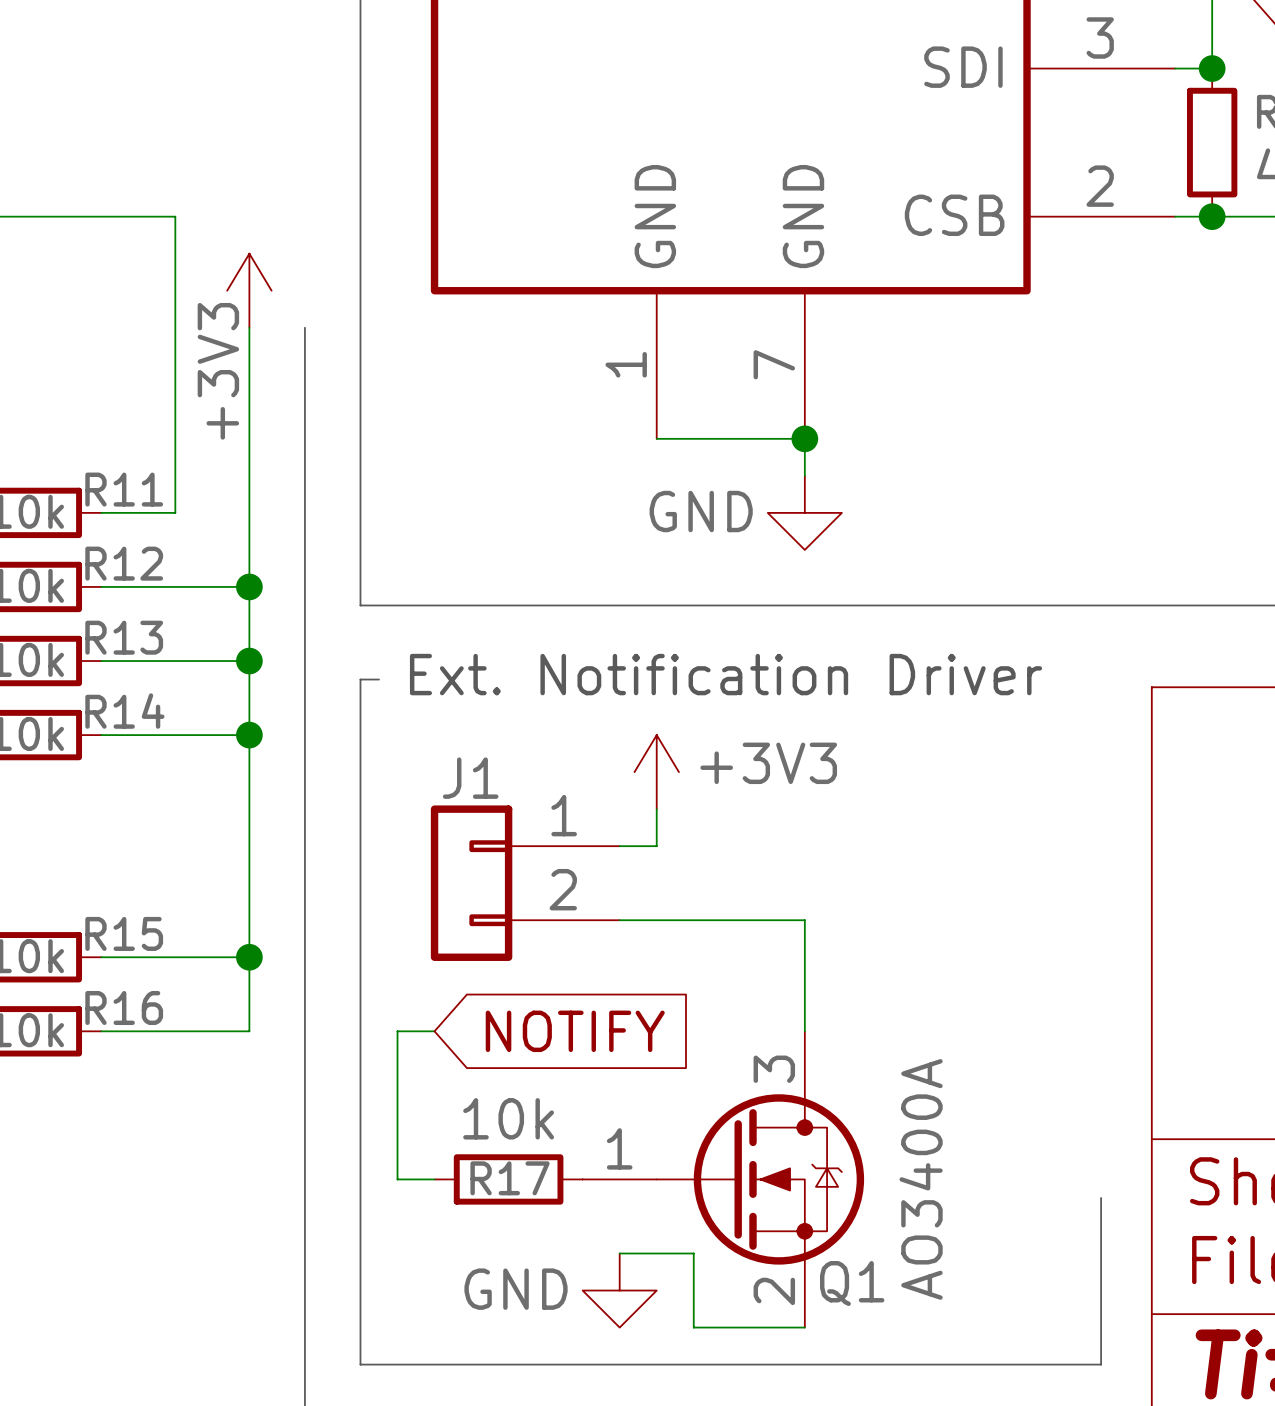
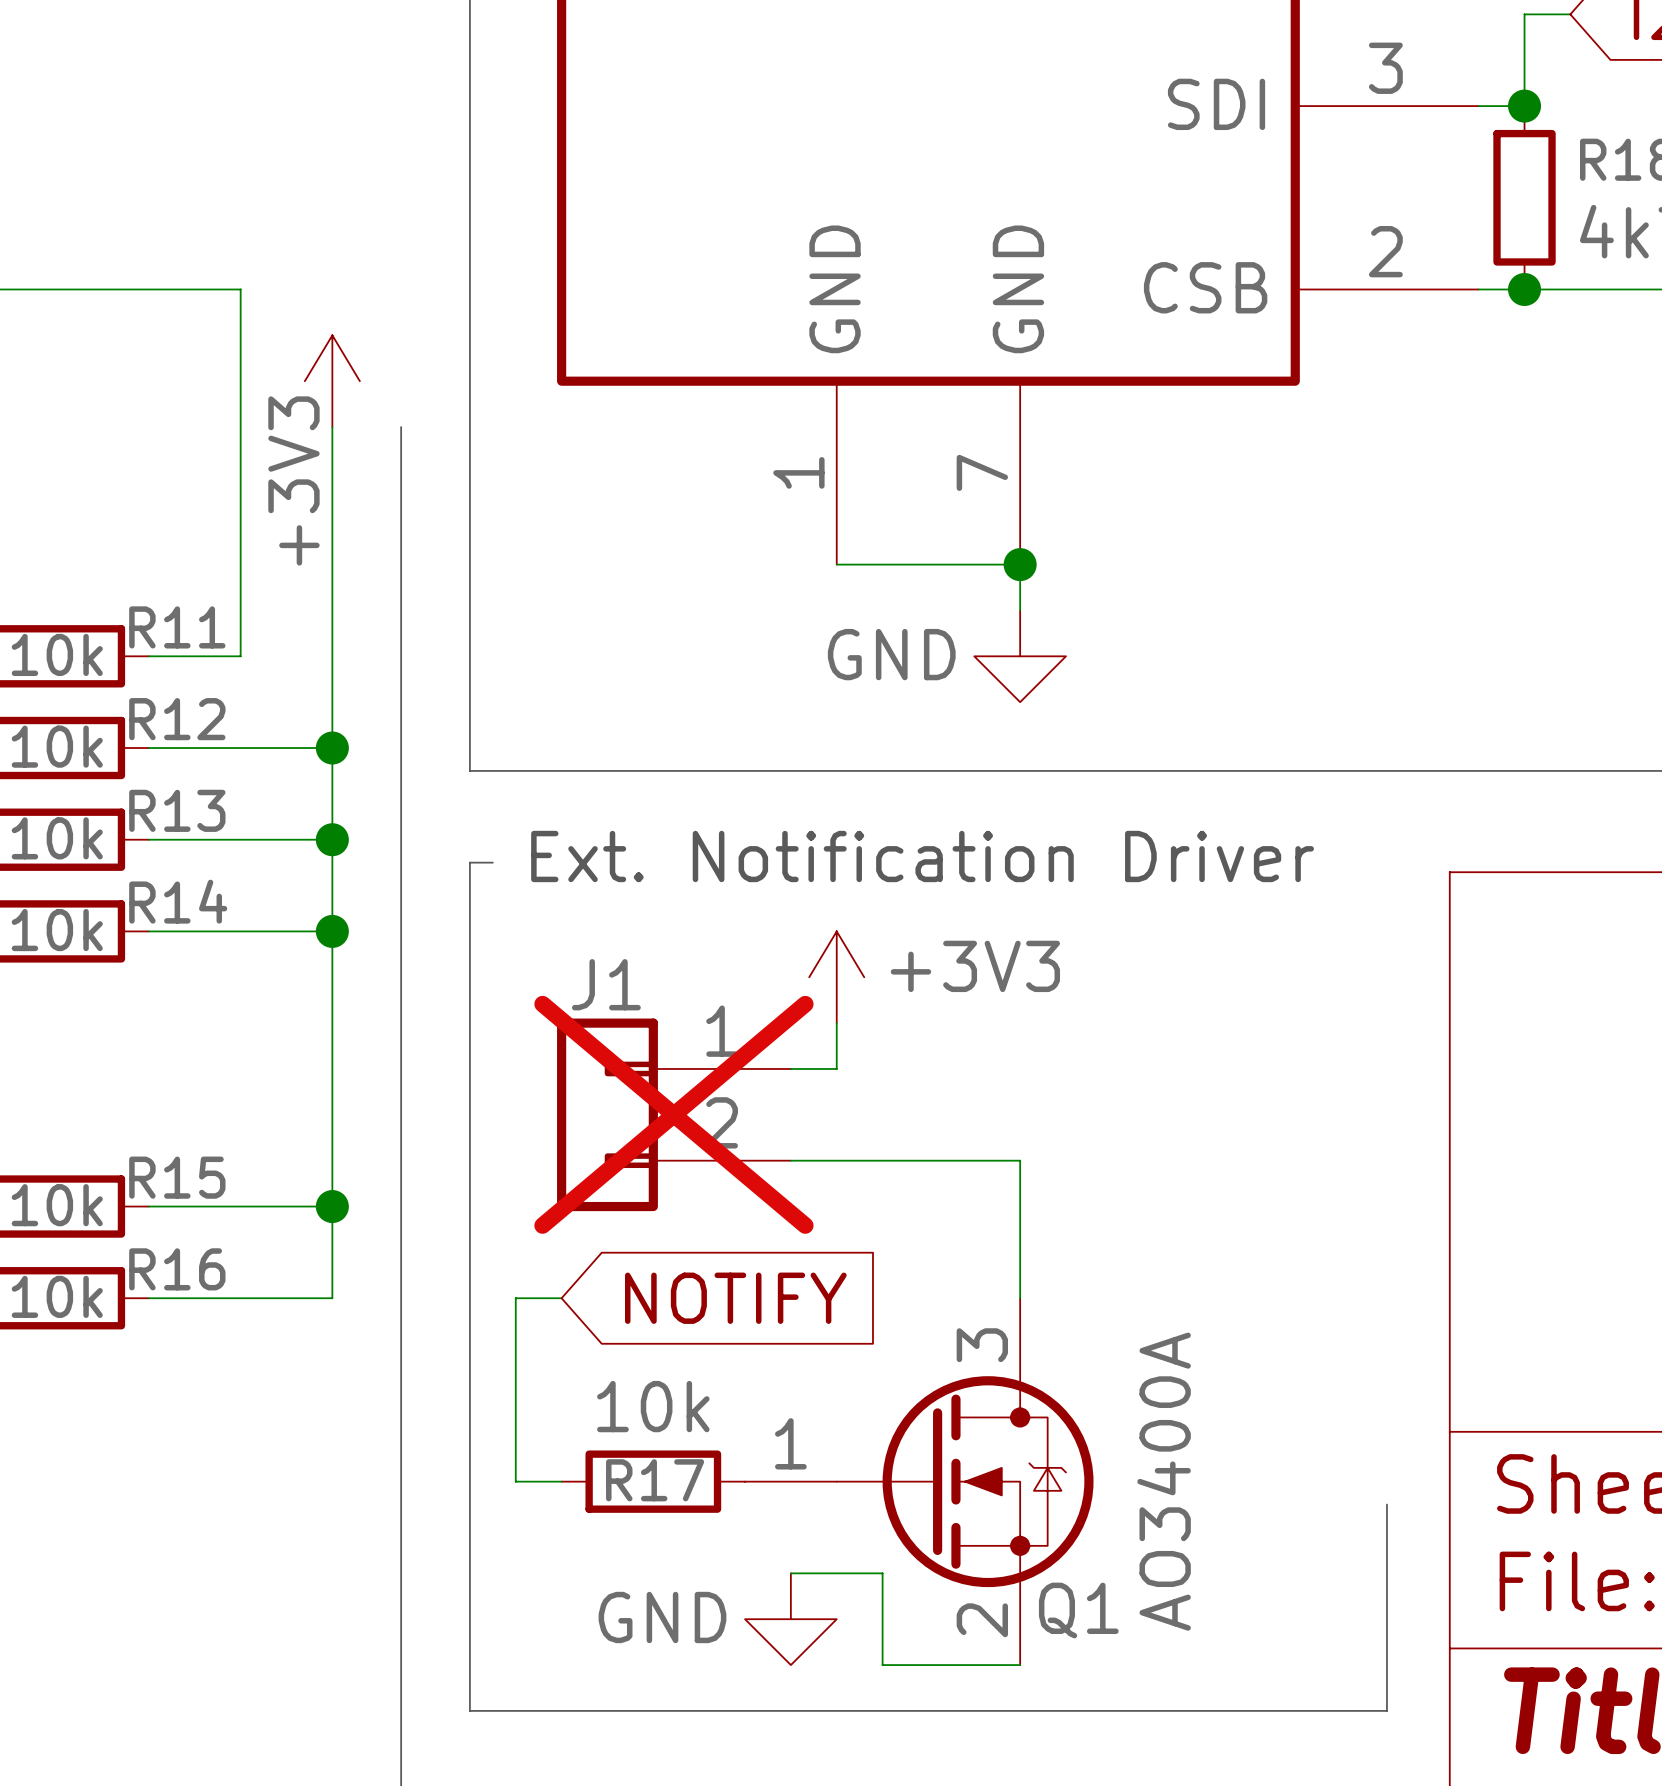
J1 do-not-place cross: none -> (673, 1114)

